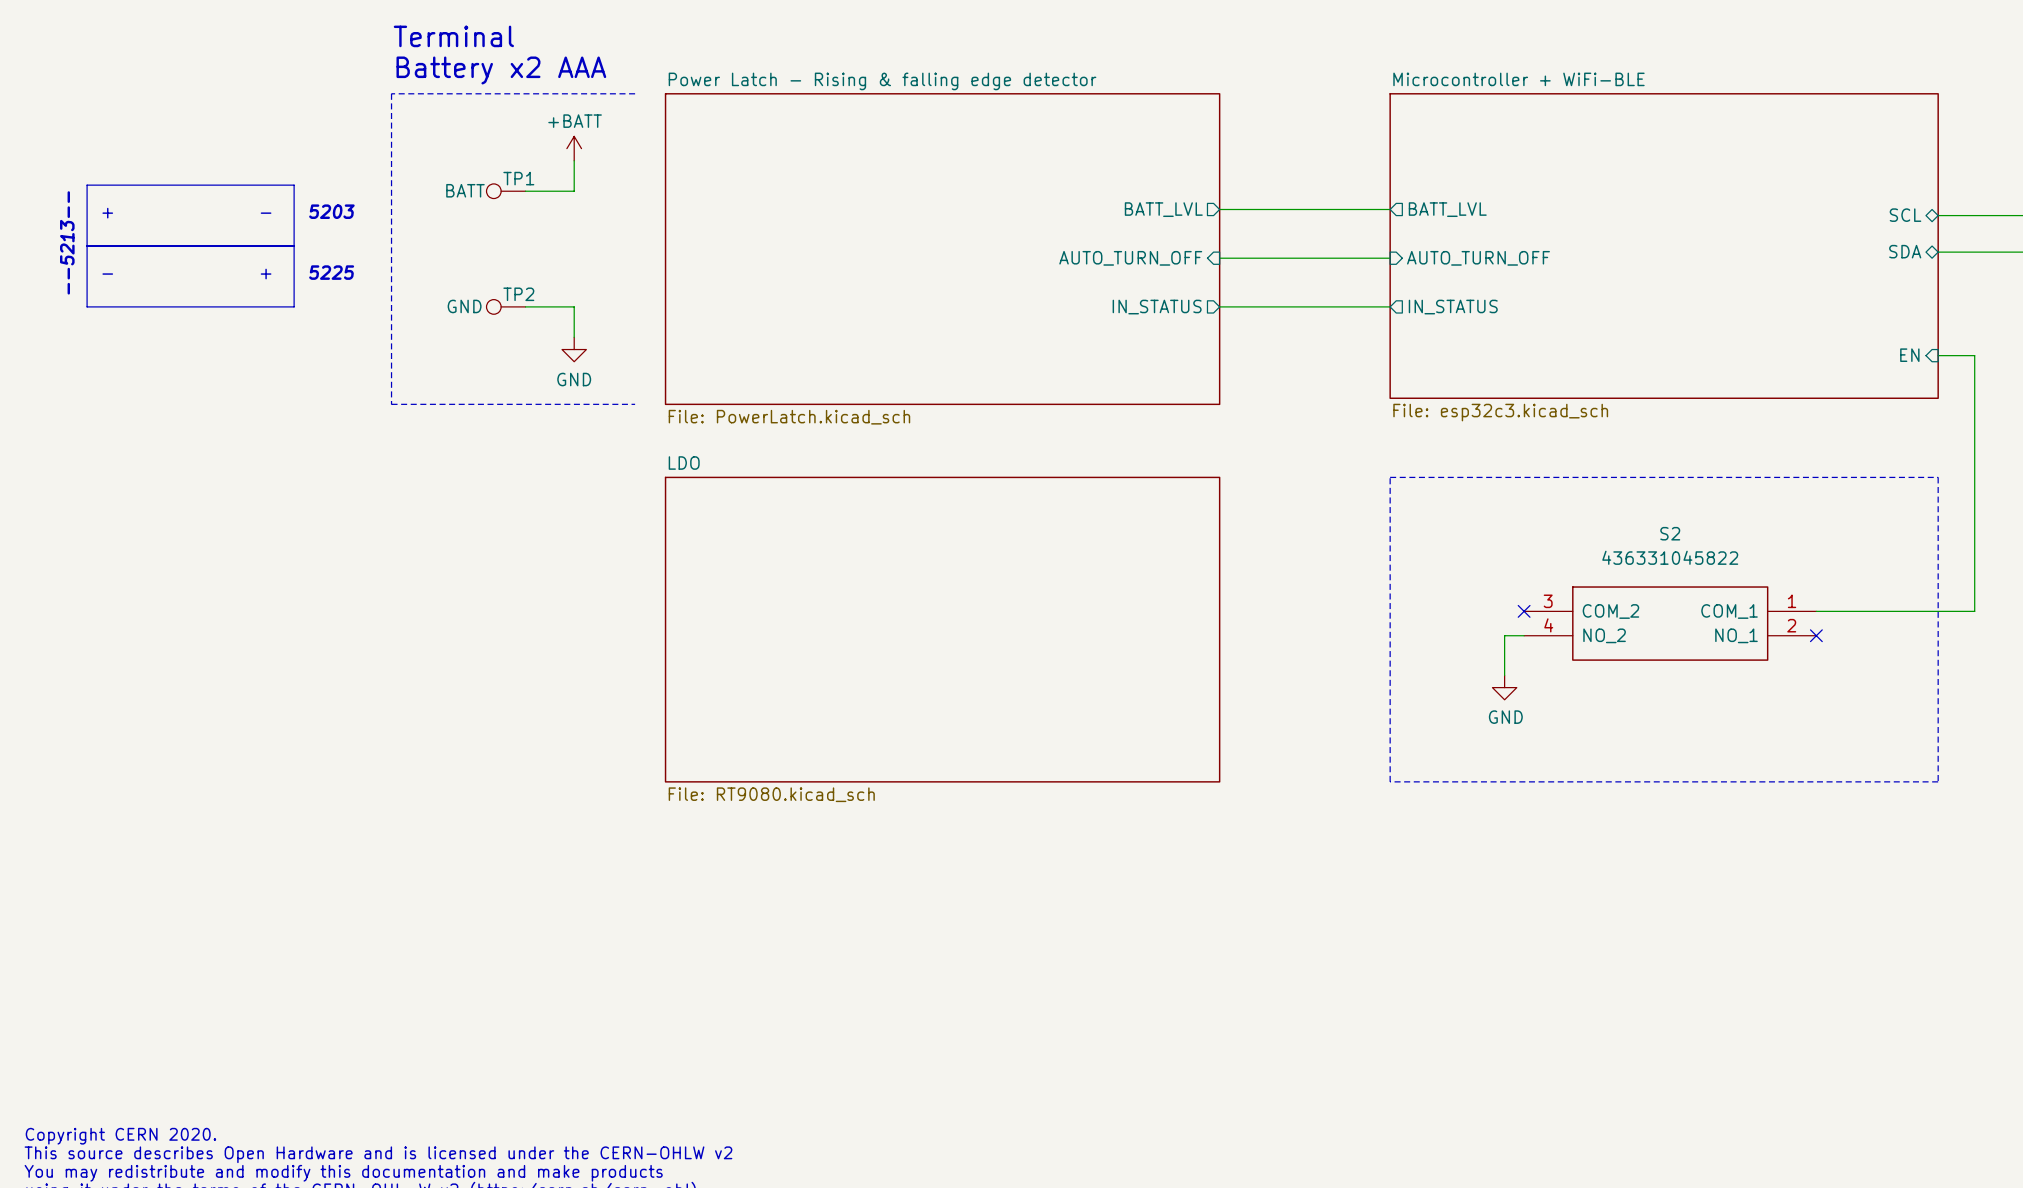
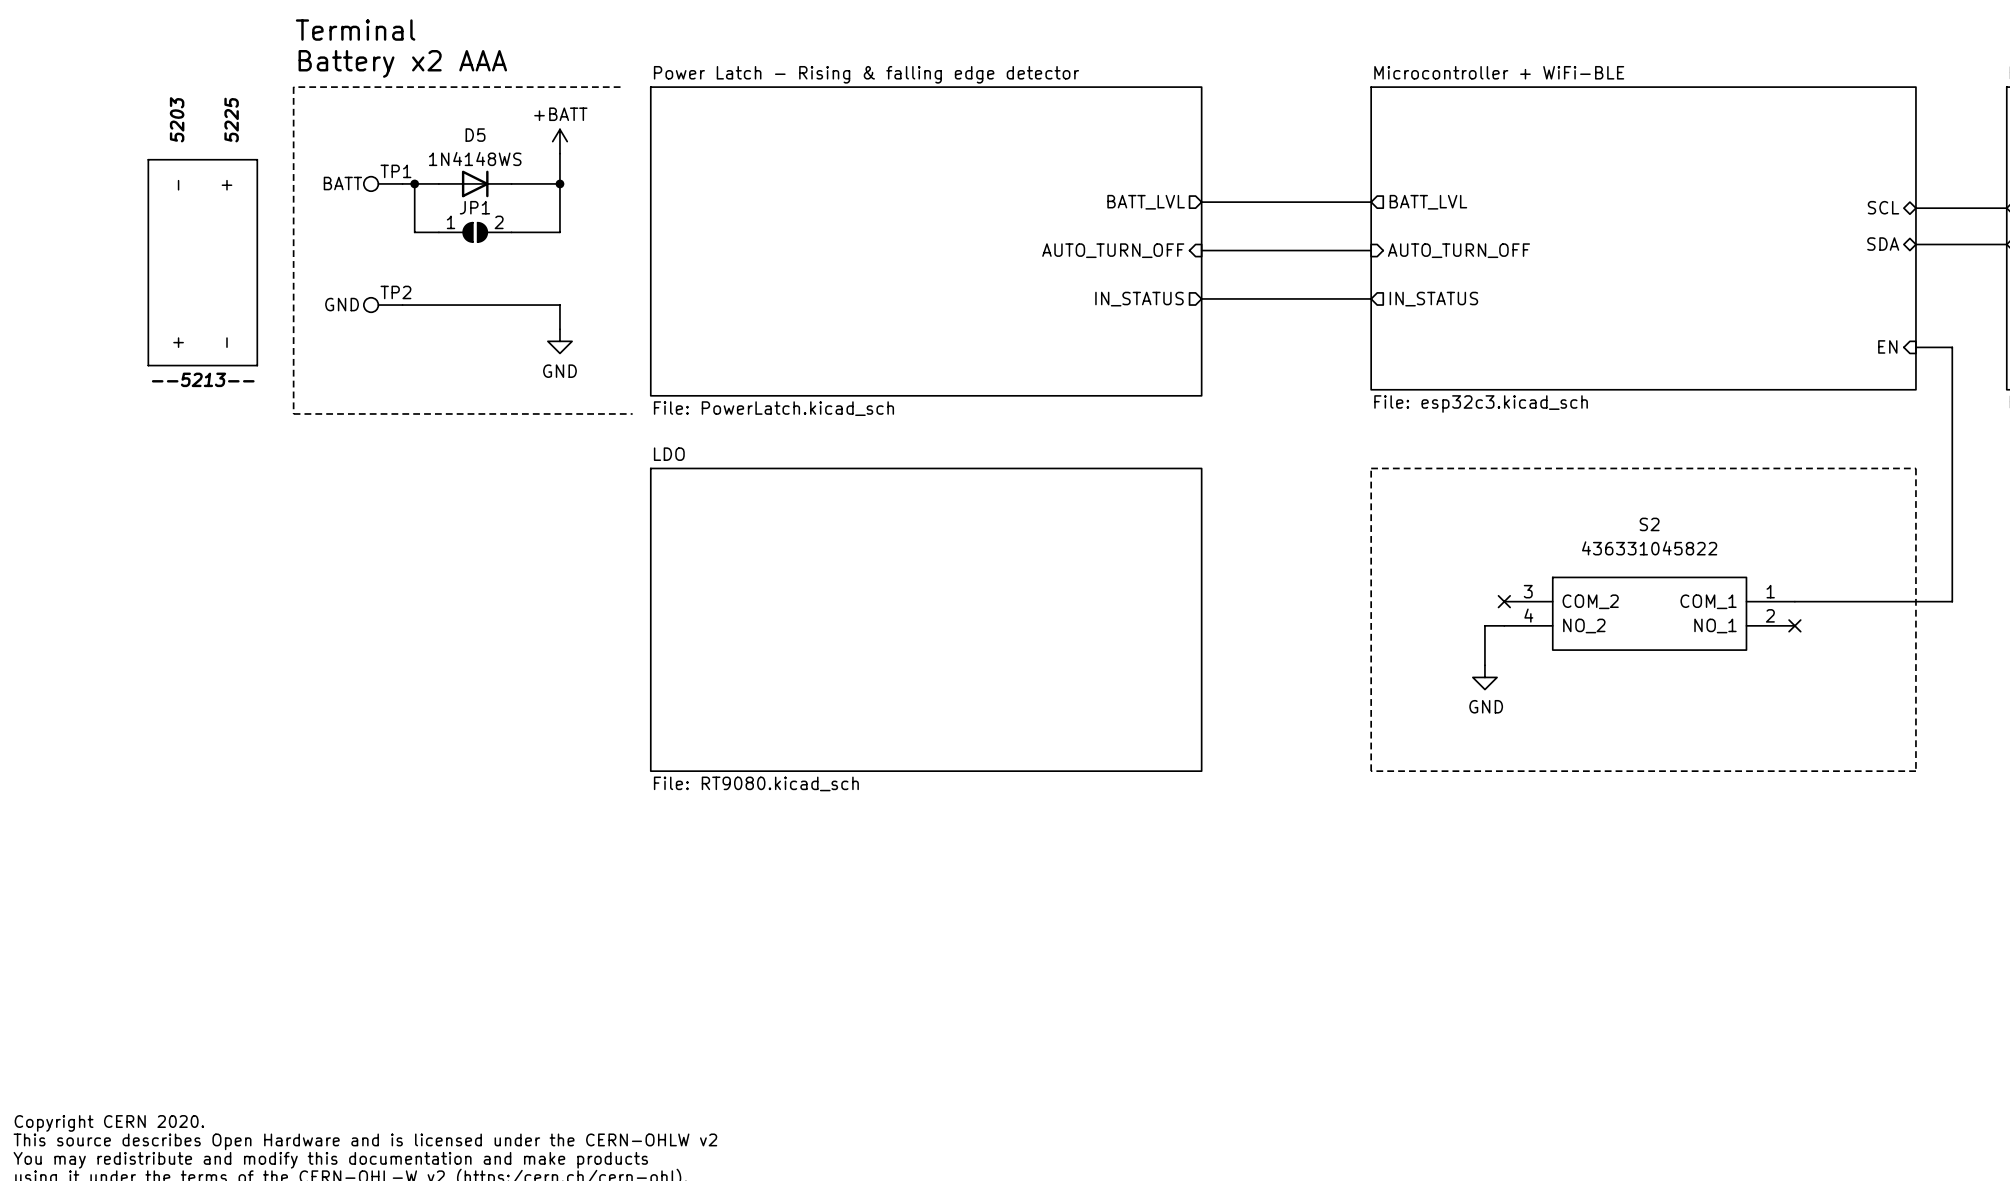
text position: Terminal (453, 36) -> Terminal (355, 30)
text position: Battery x2 AAA (501, 70) -> Battery x2 AAA (402, 63)
line: (391, 93) (391, 404) (635, 404) -> (378, 87) (293, 87) (293, 413) (632, 413)
line: none -> (148, 159) (148, 365) (257, 365) (257, 159) (148, 159)
line: (87, 185) (87, 306) (294, 306) (294, 185) (87, 185) -> none
wire: none -> (402, 183) (438, 183)
wire: none -> (414, 183) (414, 232) (438, 232)
junction: none -> (414, 183)
D5: none -> 1N4148WS (475, 183)
TP1 position: (506, 191) -> (383, 183)
wire: none -> (559, 183) (559, 232) (511, 232)
junction: none -> (559, 183)
text: none -> - (178, 185)
text: none -> + (226, 185)
text rotation: 0° (331, 211) -> 90° counterclockwise (177, 119)
text position: 5203 (331, 211) -> 5203 (177, 119)
text: + (107, 213) -> none
text: - (266, 213) -> none
JP1: none -> (475, 232)
text rotation: 0° (67, 242) -> 90° clockwise (203, 379)
text position: --5213-- (67, 242) -> --5213-- (203, 379)
line: (87, 246) (294, 246) -> none
text rotation: 0° (331, 272) -> 90° counterclockwise (231, 120)
text position: 5225 (331, 272) -> 5225 (231, 120)
text: - (107, 274) -> none
text: + (266, 274) -> none
TP2 position: (506, 306) -> (383, 305)
wire: (525, 306) (574, 306) (574, 313) -> (402, 305) (559, 305)
text: none -> + (178, 342)
text: none -> - (226, 342)

